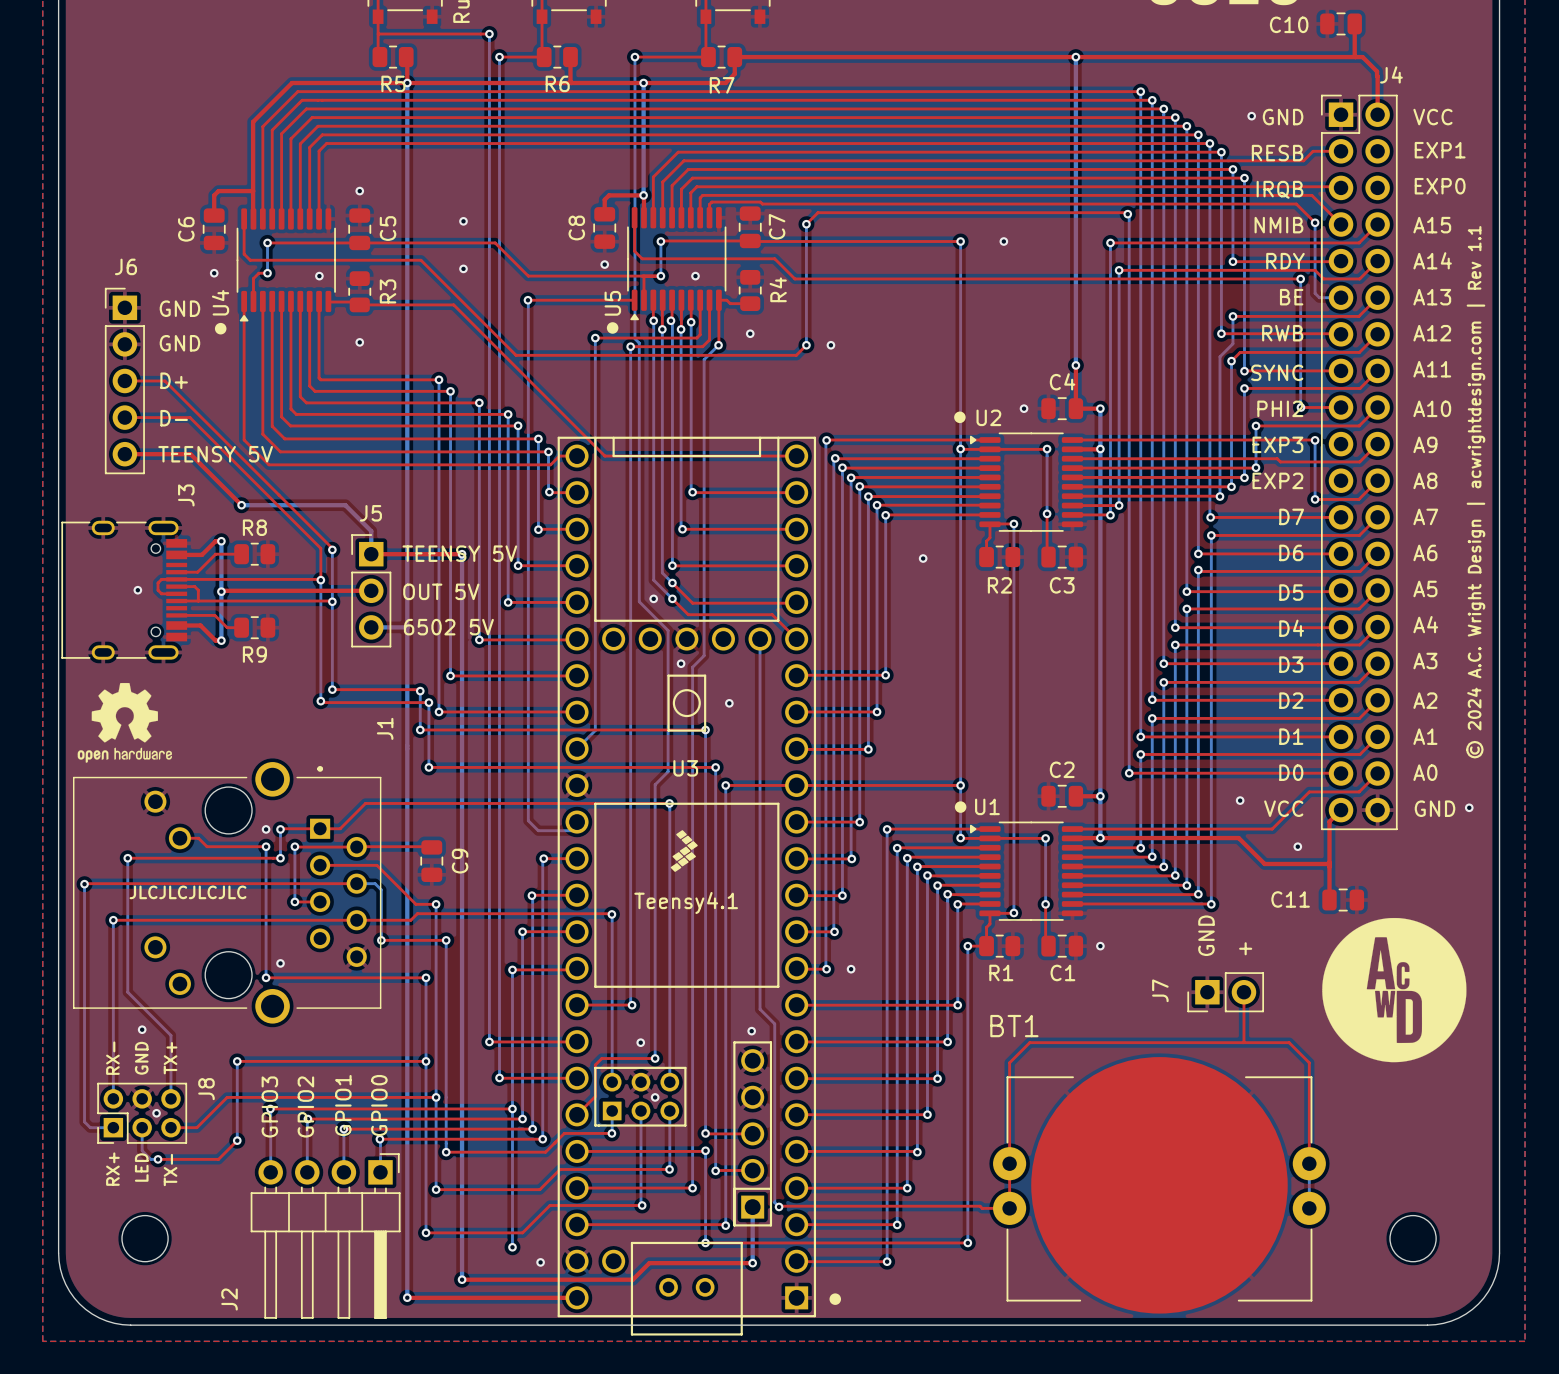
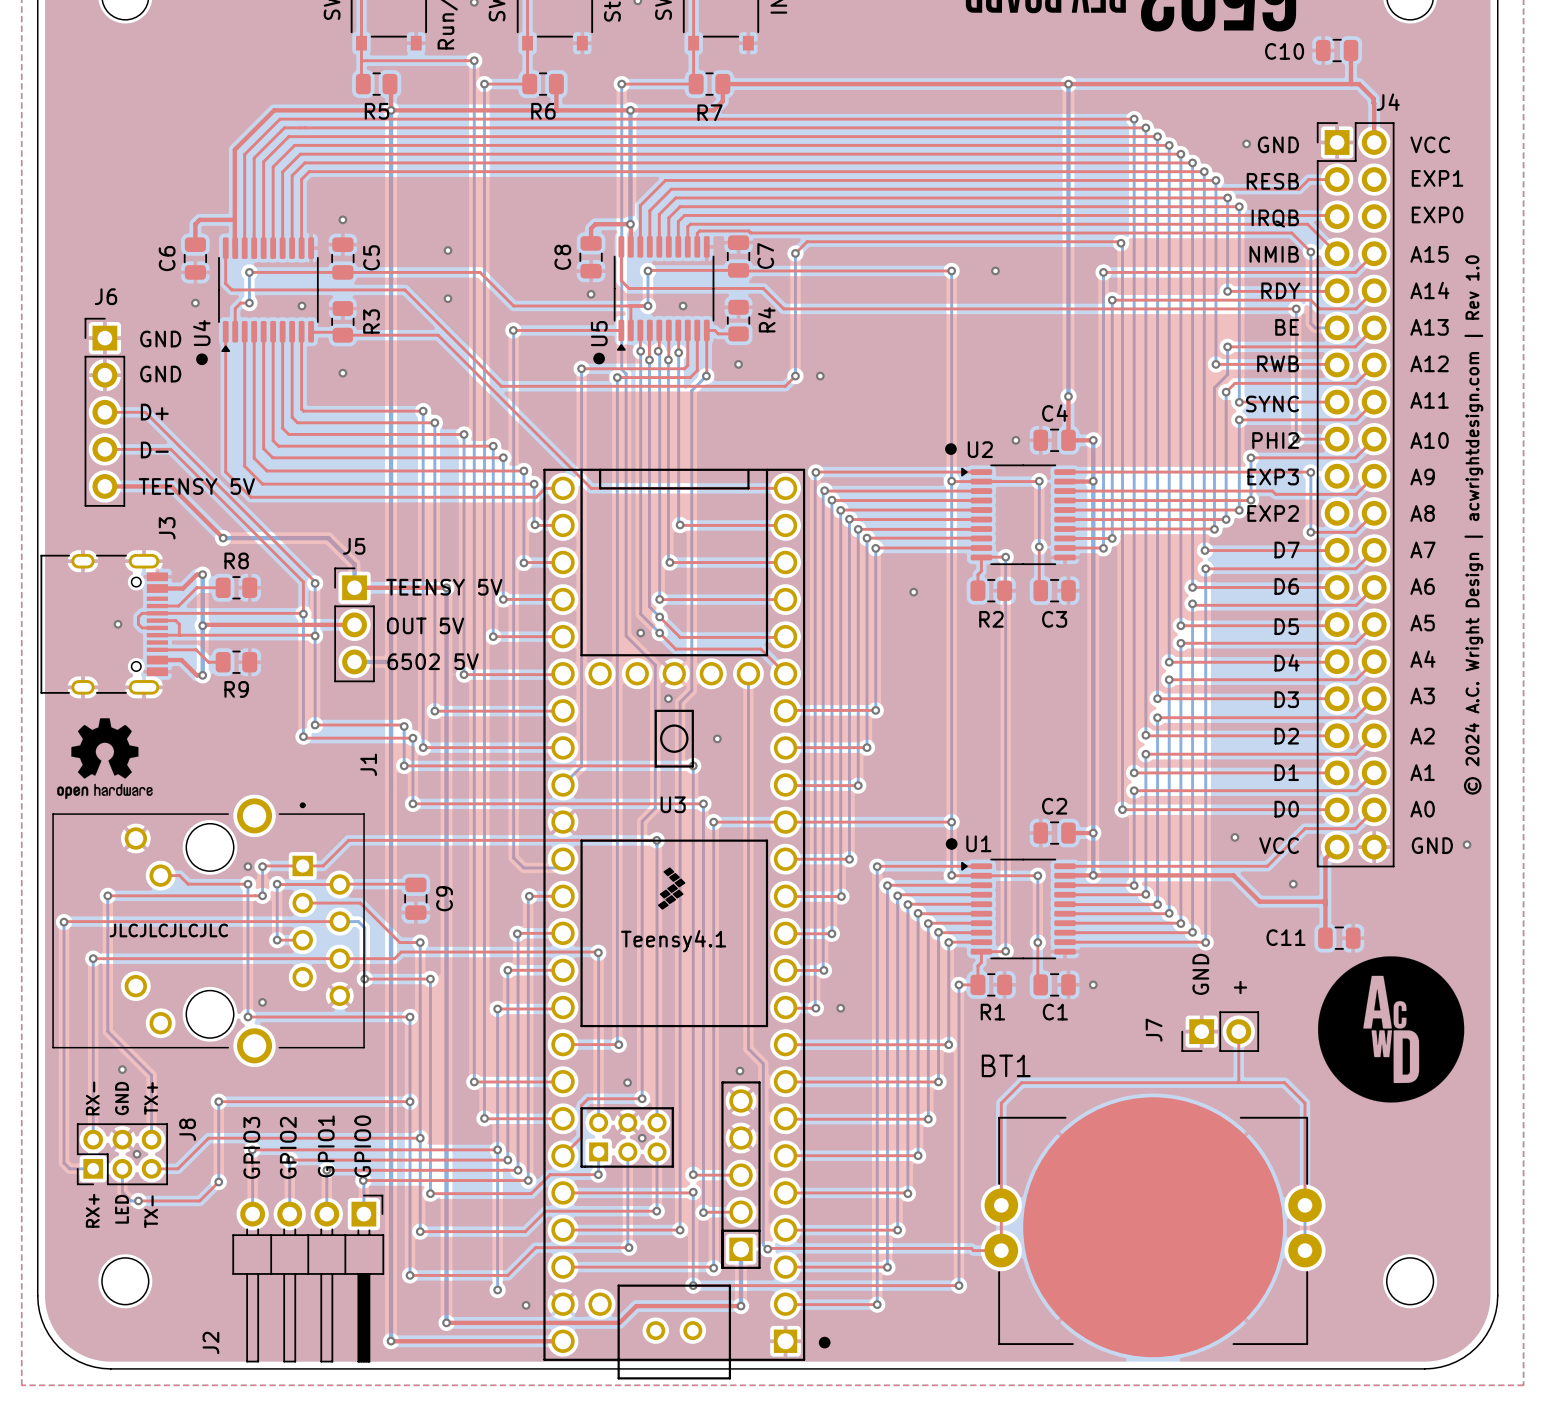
text: © 2024 A.C. Wright Design | acwrightdesign.com | Rev 1.1 (1475, 492) -> © 2024 A.C. Wright Design | acwrightdesign.com | Rev 1.0 (1473, 524)

